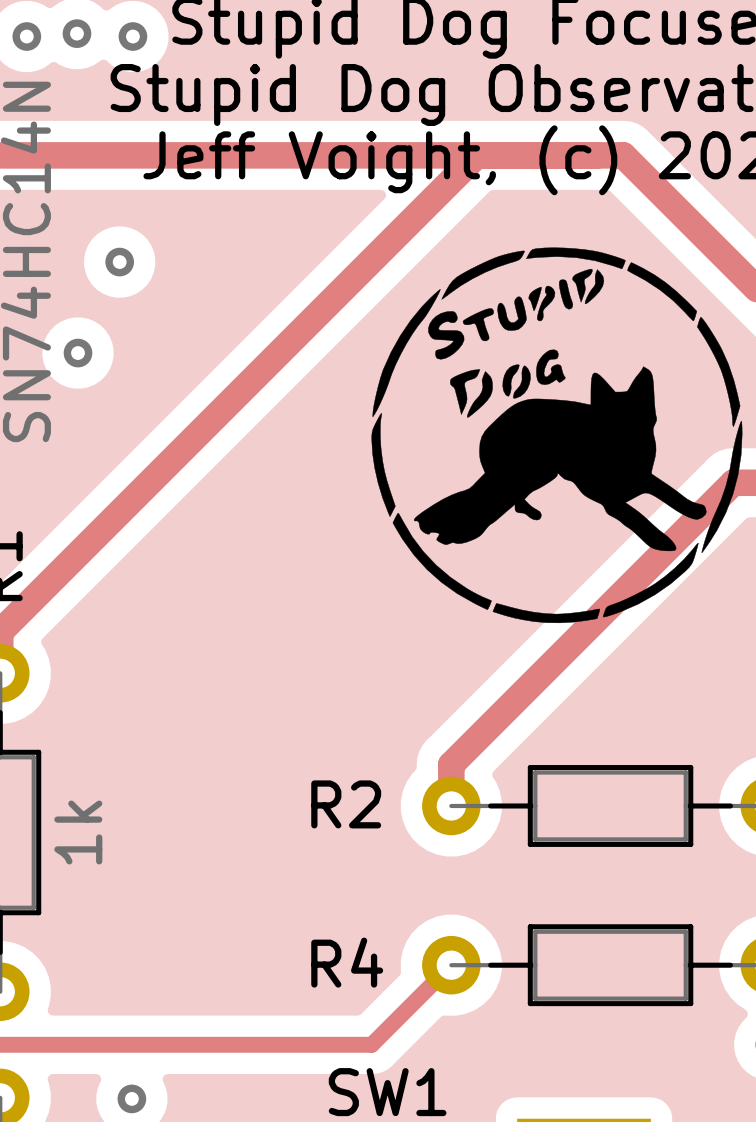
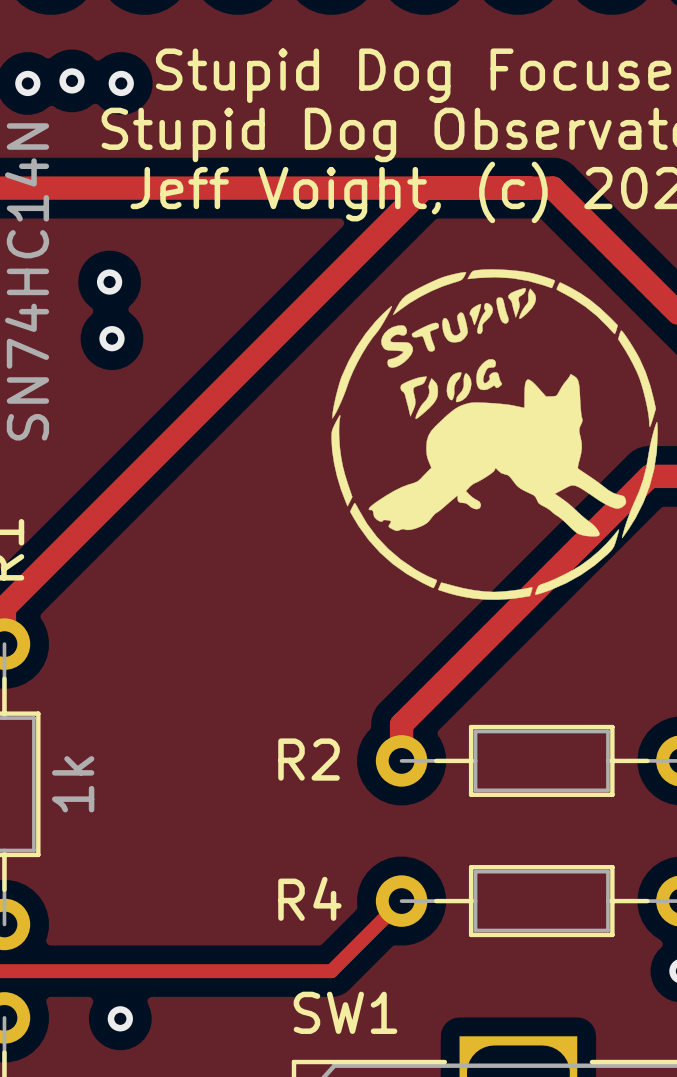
via position: (78, 353) -> (111, 338)

